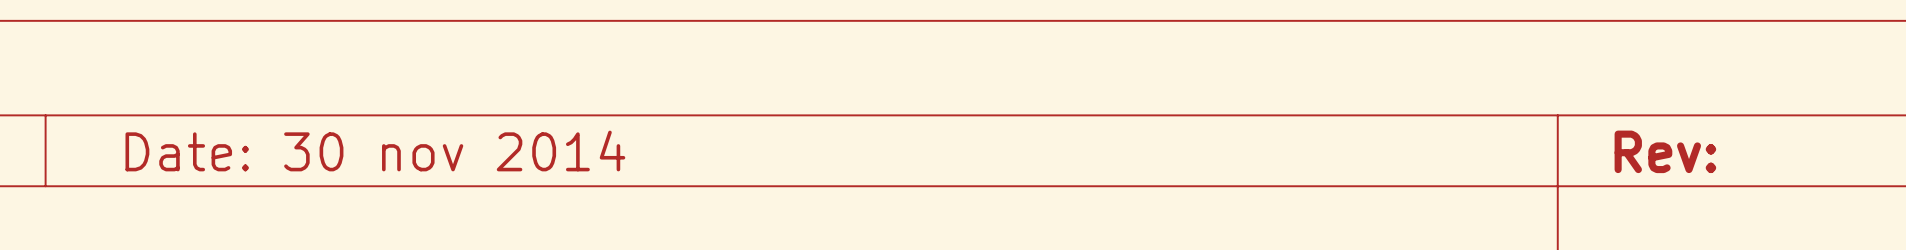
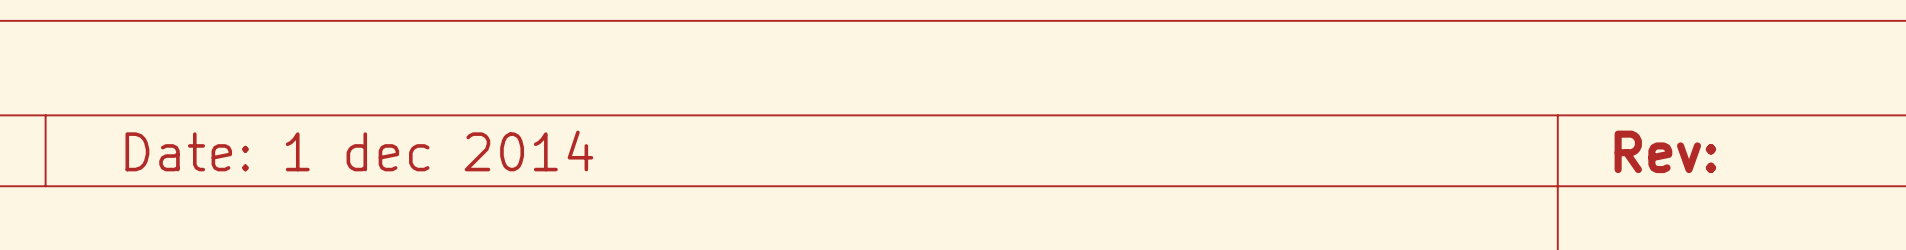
title block: Date: 30 nov 2014 (375, 151) -> Date: 1 dec 2014 (359, 151)

